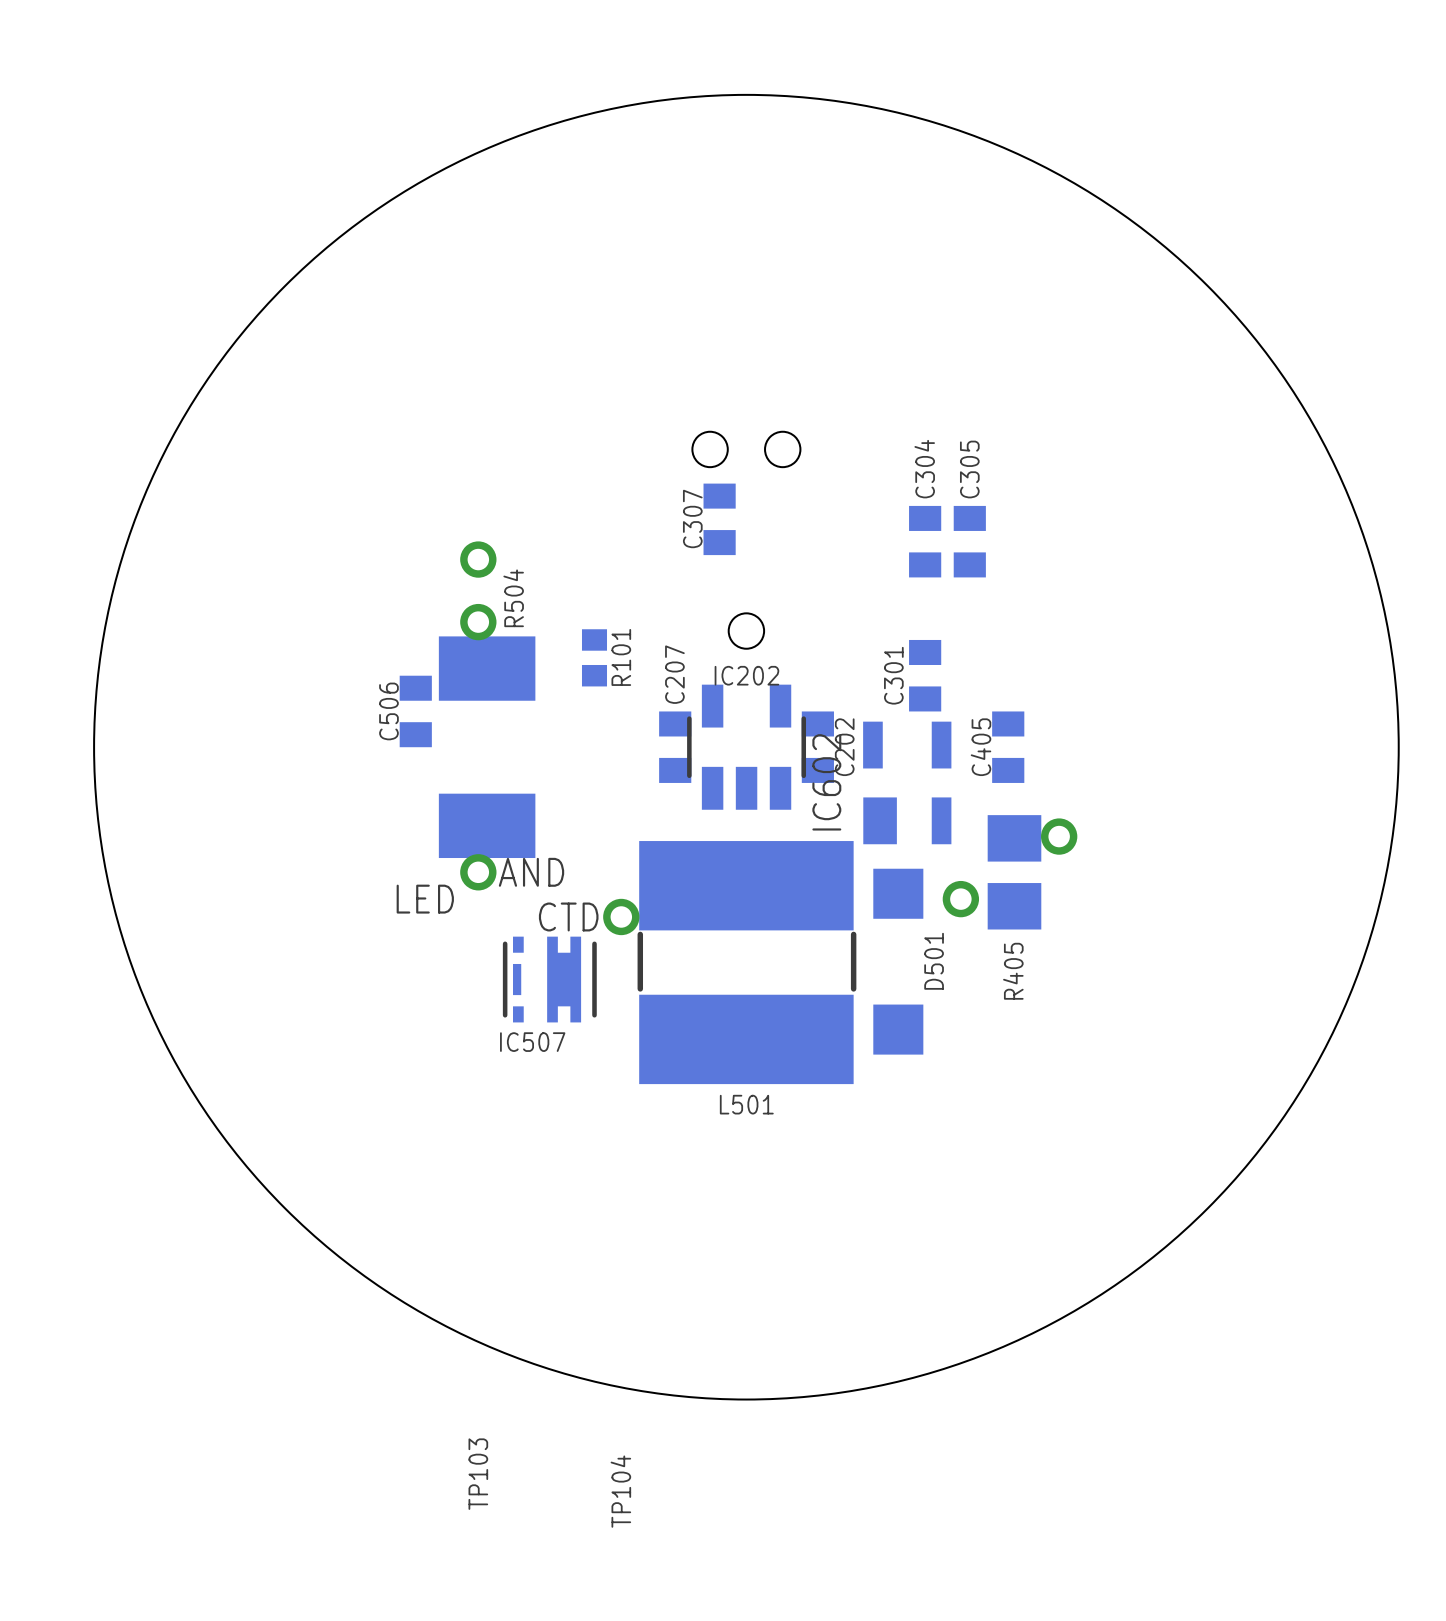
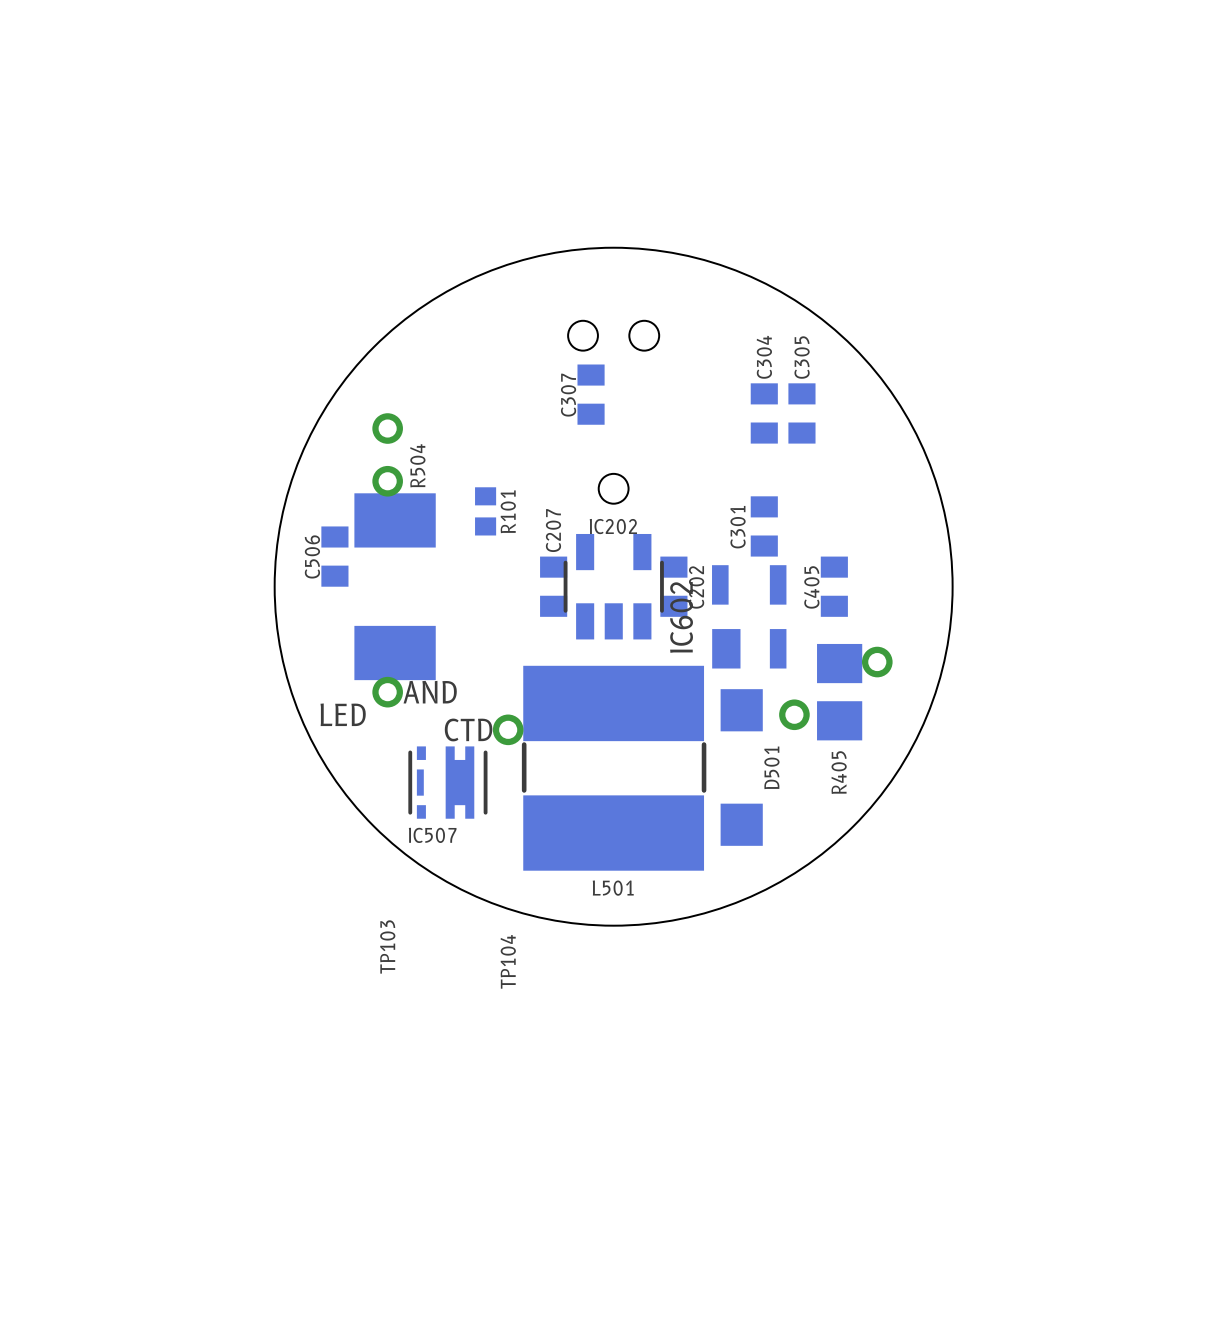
round board edge size: [93, 94, 1399, 1400] -> [274, 247, 953, 926]
TP103 name position: TP103 (478, 1474) -> TP103 (387, 946)
TP104 name position: TP104 (620, 1491) -> TP104 (508, 961)

